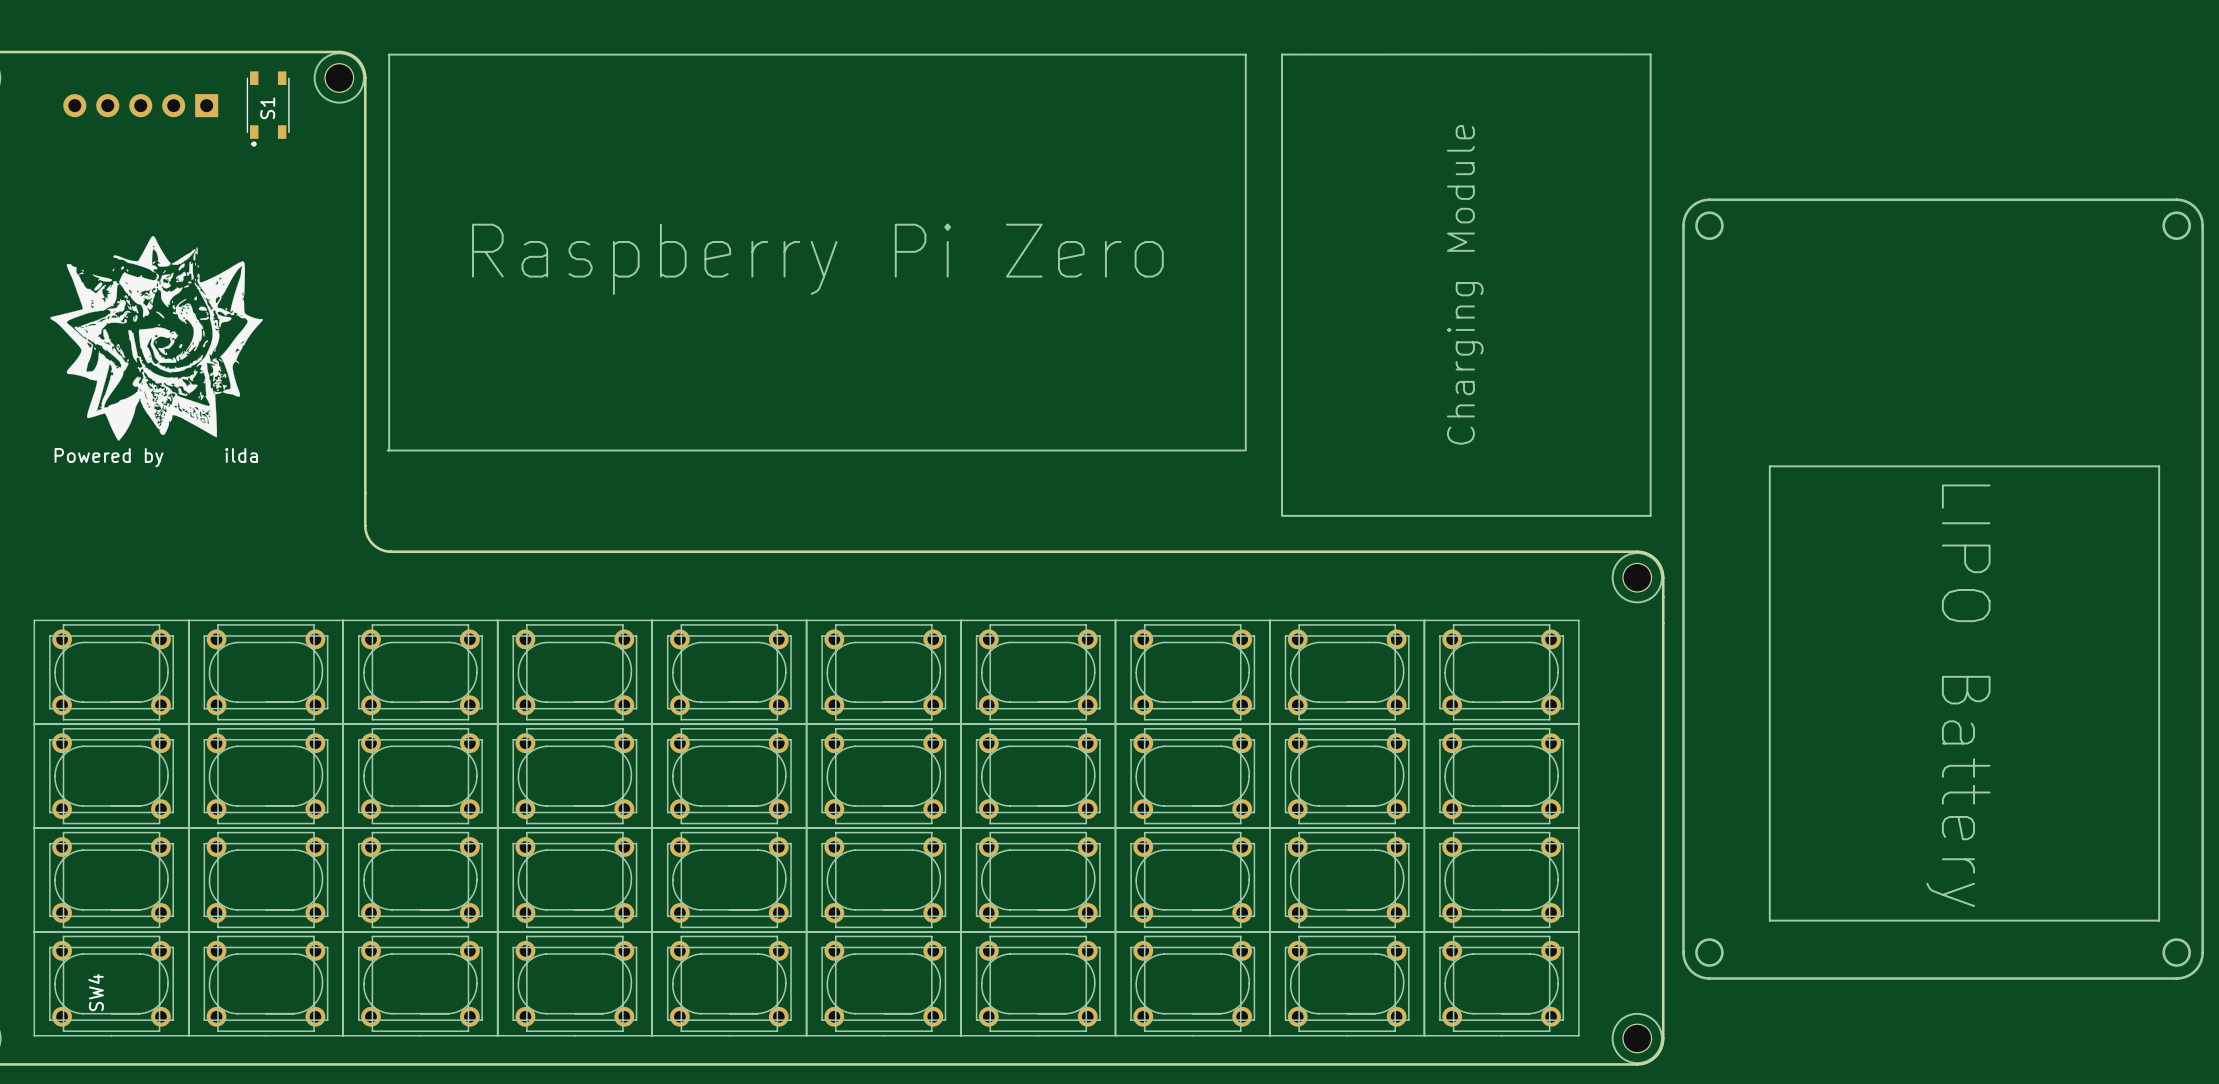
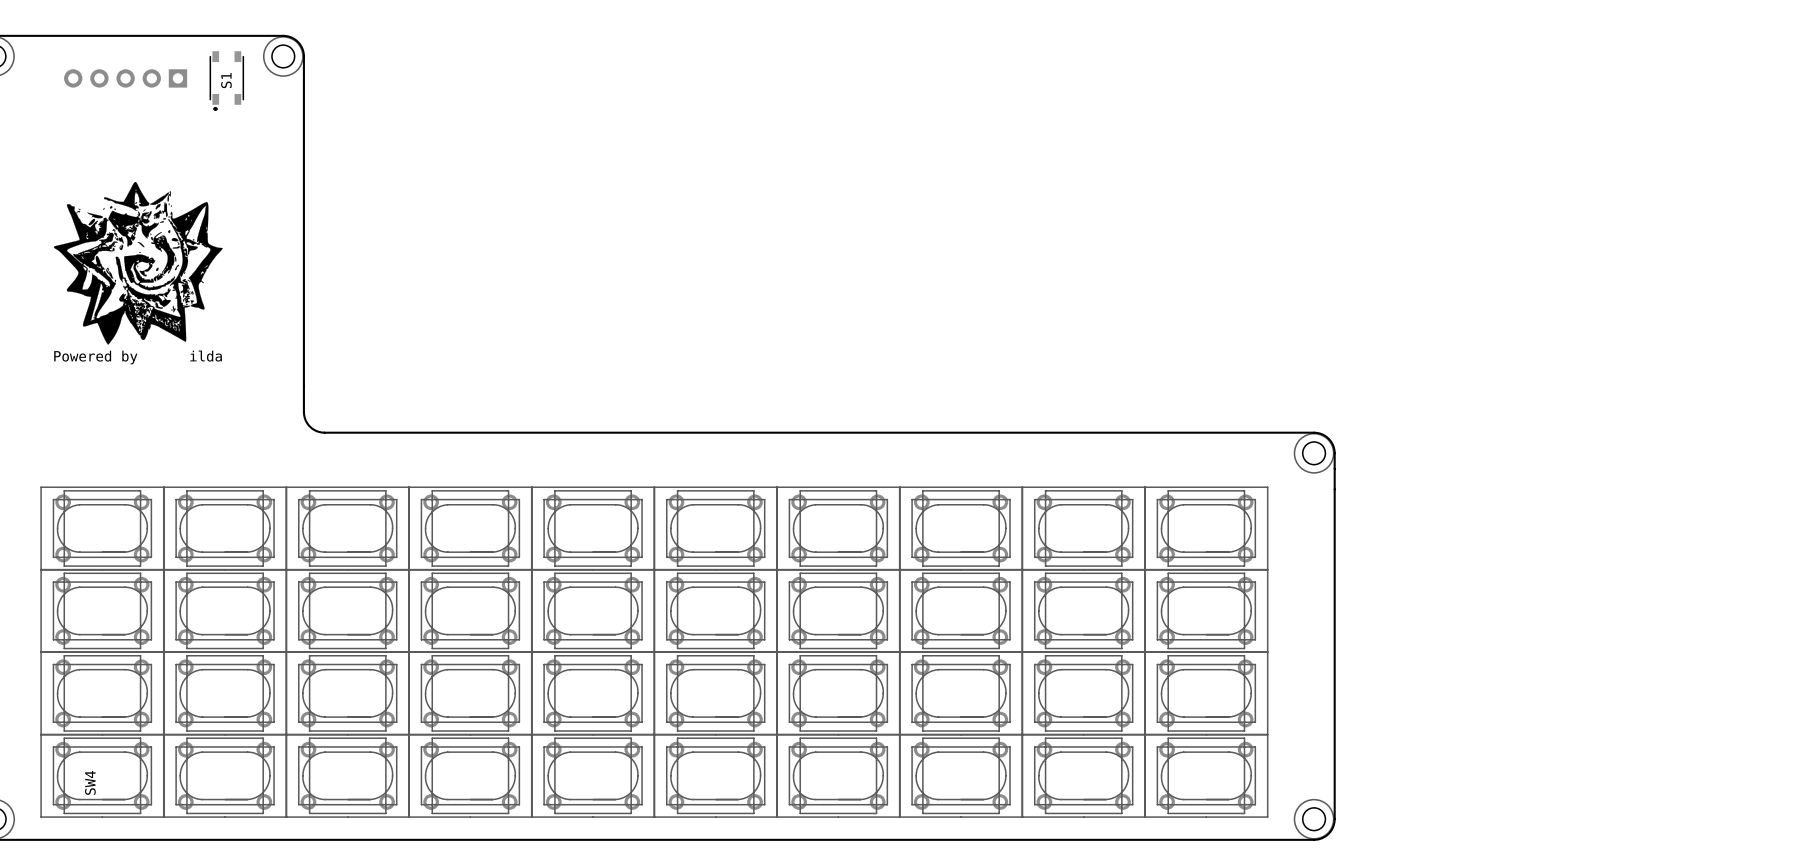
line: (1282, 54) (1282, 515) -> none
line: (1282, 54) (1650, 54) (1650, 515) (1282, 515) -> none
line: (1709, 199) (2176, 199) (2189, 203) (2199, 212) (2202, 225) (2202, 952) (2198, 966) (2190, 974) (2176, 978) (1709, 978) (1698, 975) (1687, 966) (1683, 952) (1683, 225) (1685, 215) (1691, 207) (1699, 201) (1709, 199) -> none
drawing: [1695, 211, 1724, 240] -> none
drawing: [2162, 211, 2191, 240] -> none
text: Raspberry Pi Zero (817, 259) -> none
text: Charging Module (1465, 284) -> none
line: (387, 450) (1244, 450) -> none
line: (389, 450) (389, 54) (1245, 54) (1245, 450) -> none
line: (1769, 466) (2159, 466) (2159, 920) (1769, 920) (1769, 466) -> none
text: LIPO Battery (1958, 695) -> none
drawing: [1695, 938, 1724, 967] -> none
drawing: [2162, 938, 2191, 967] -> none

